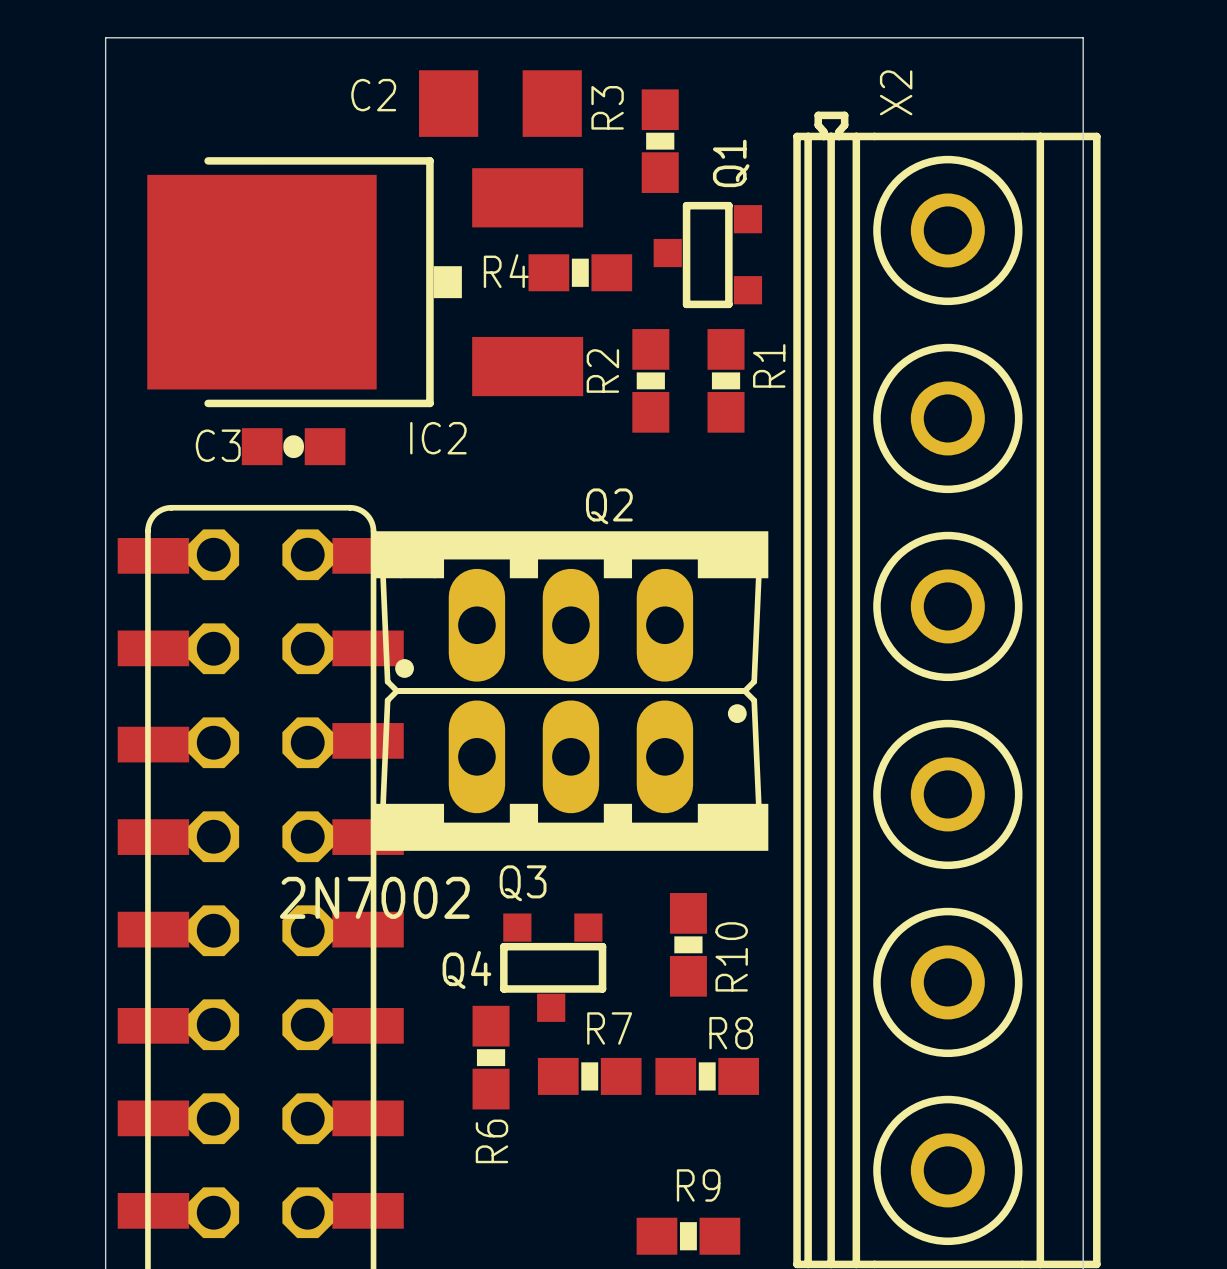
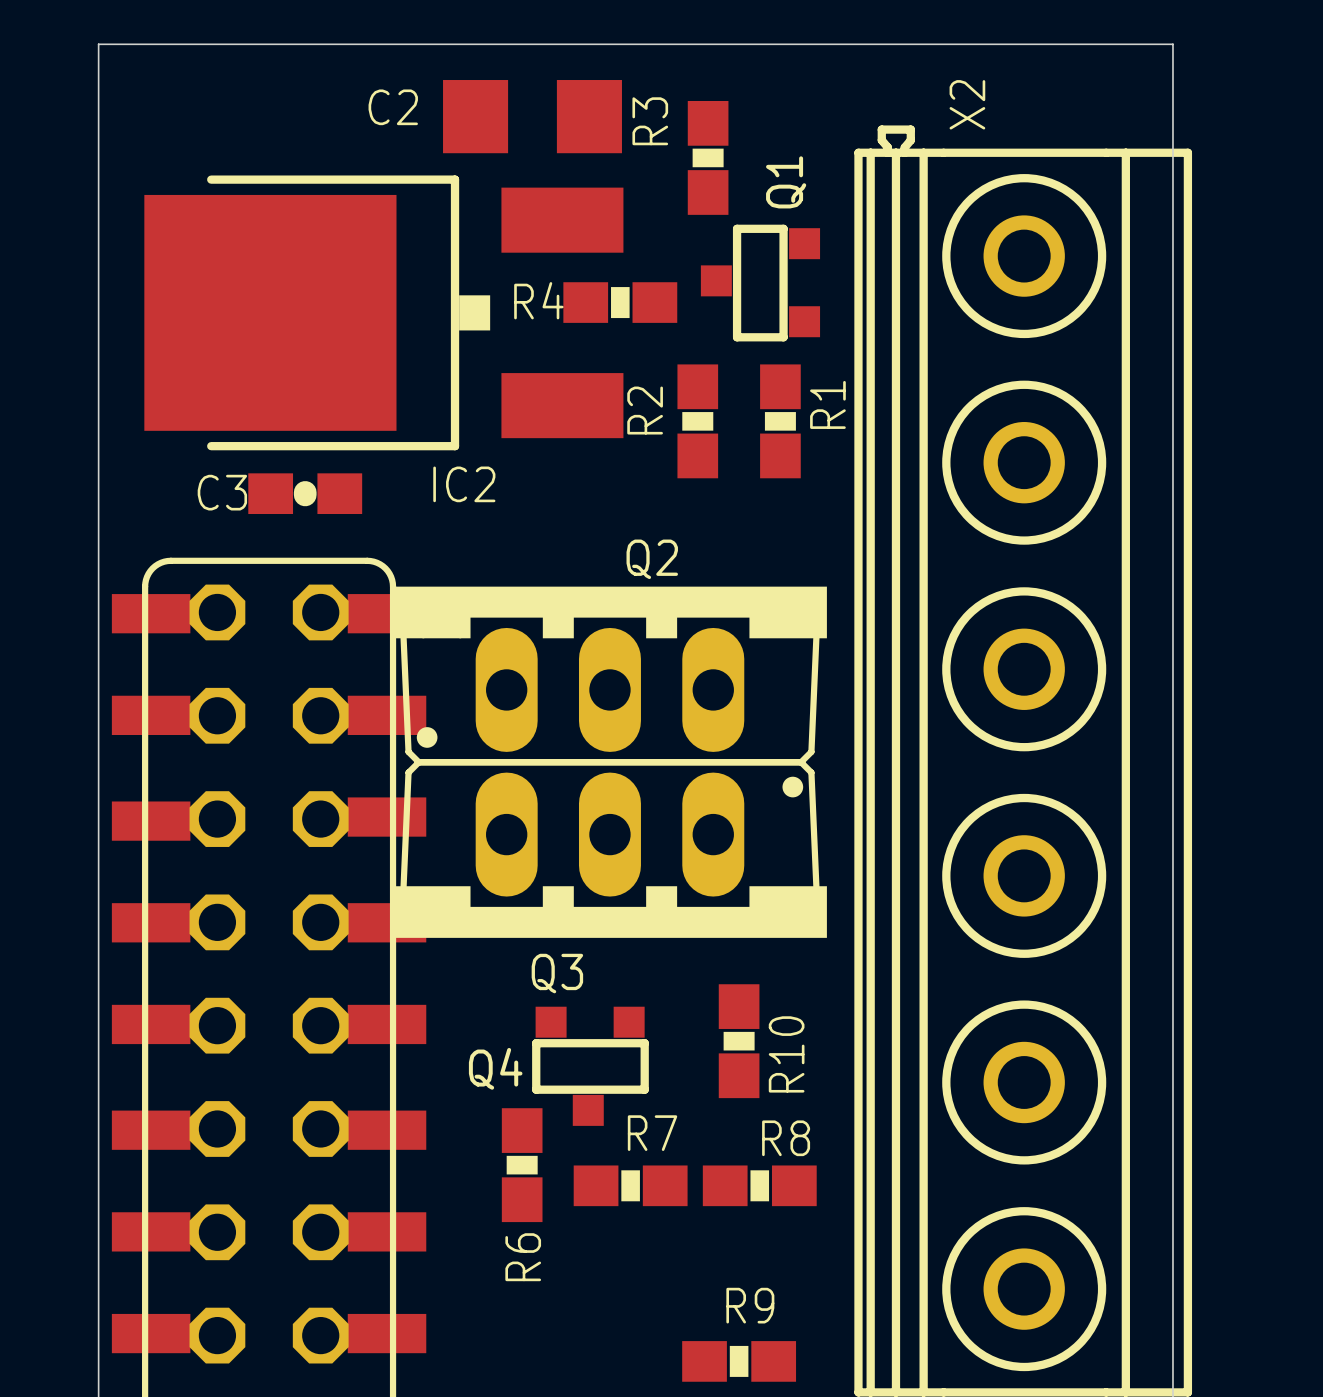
Q4 value: 2N7002 (374, 897) -> none

